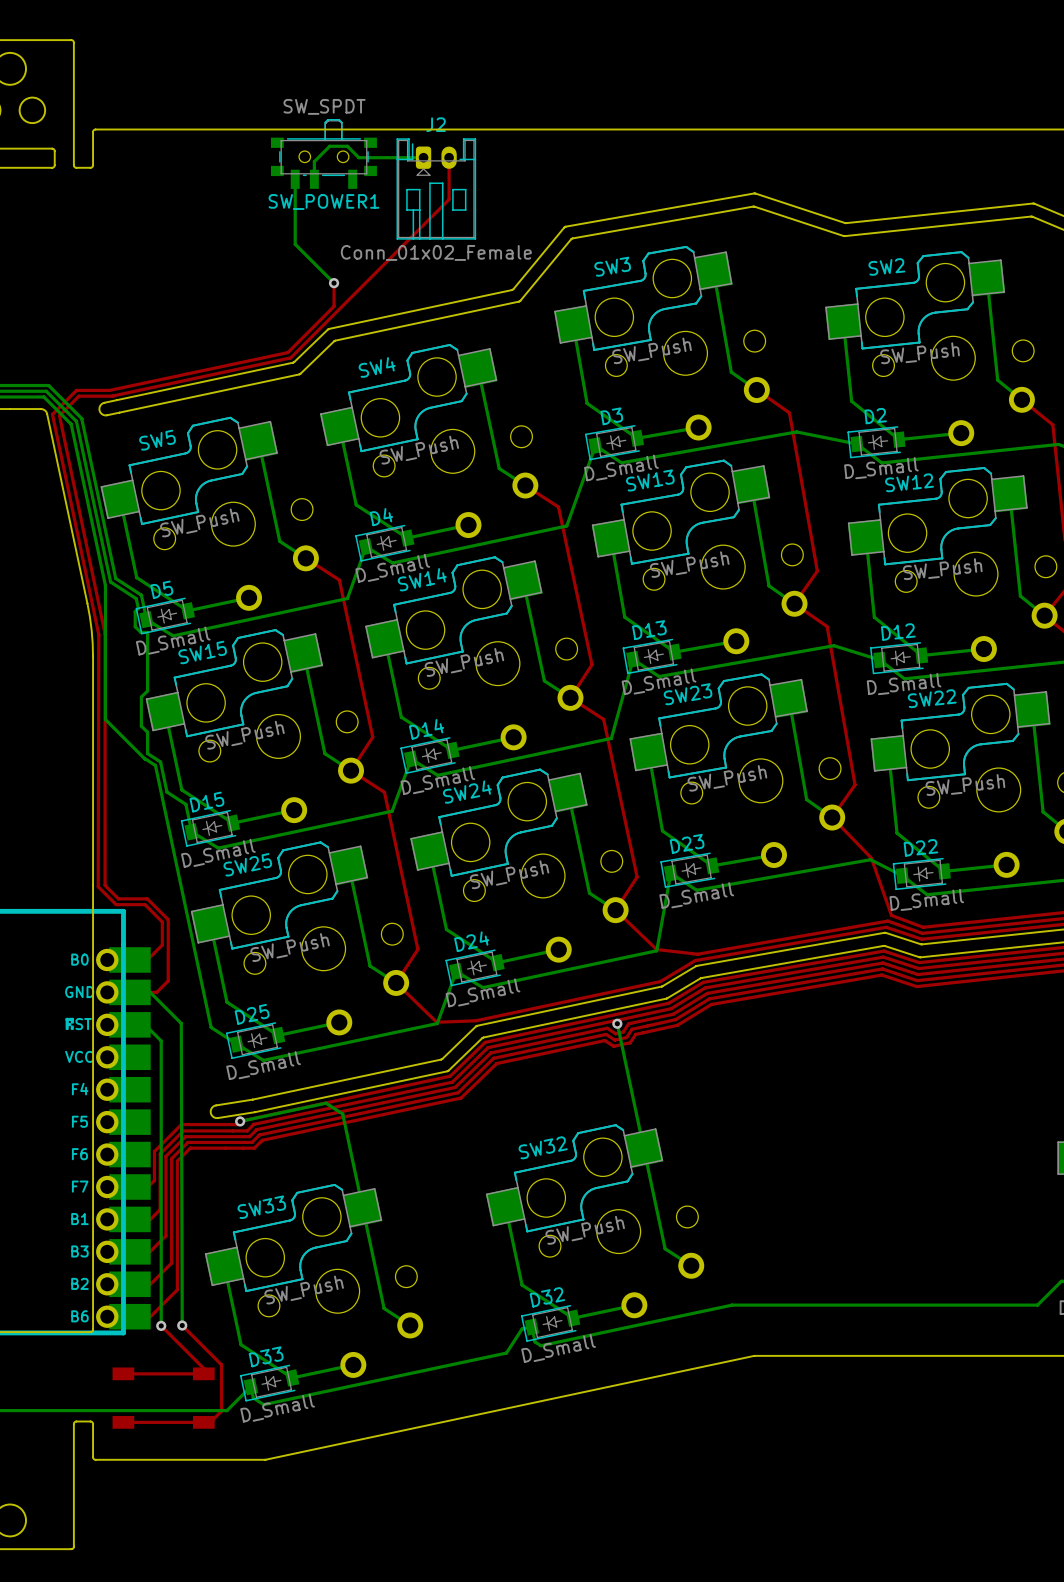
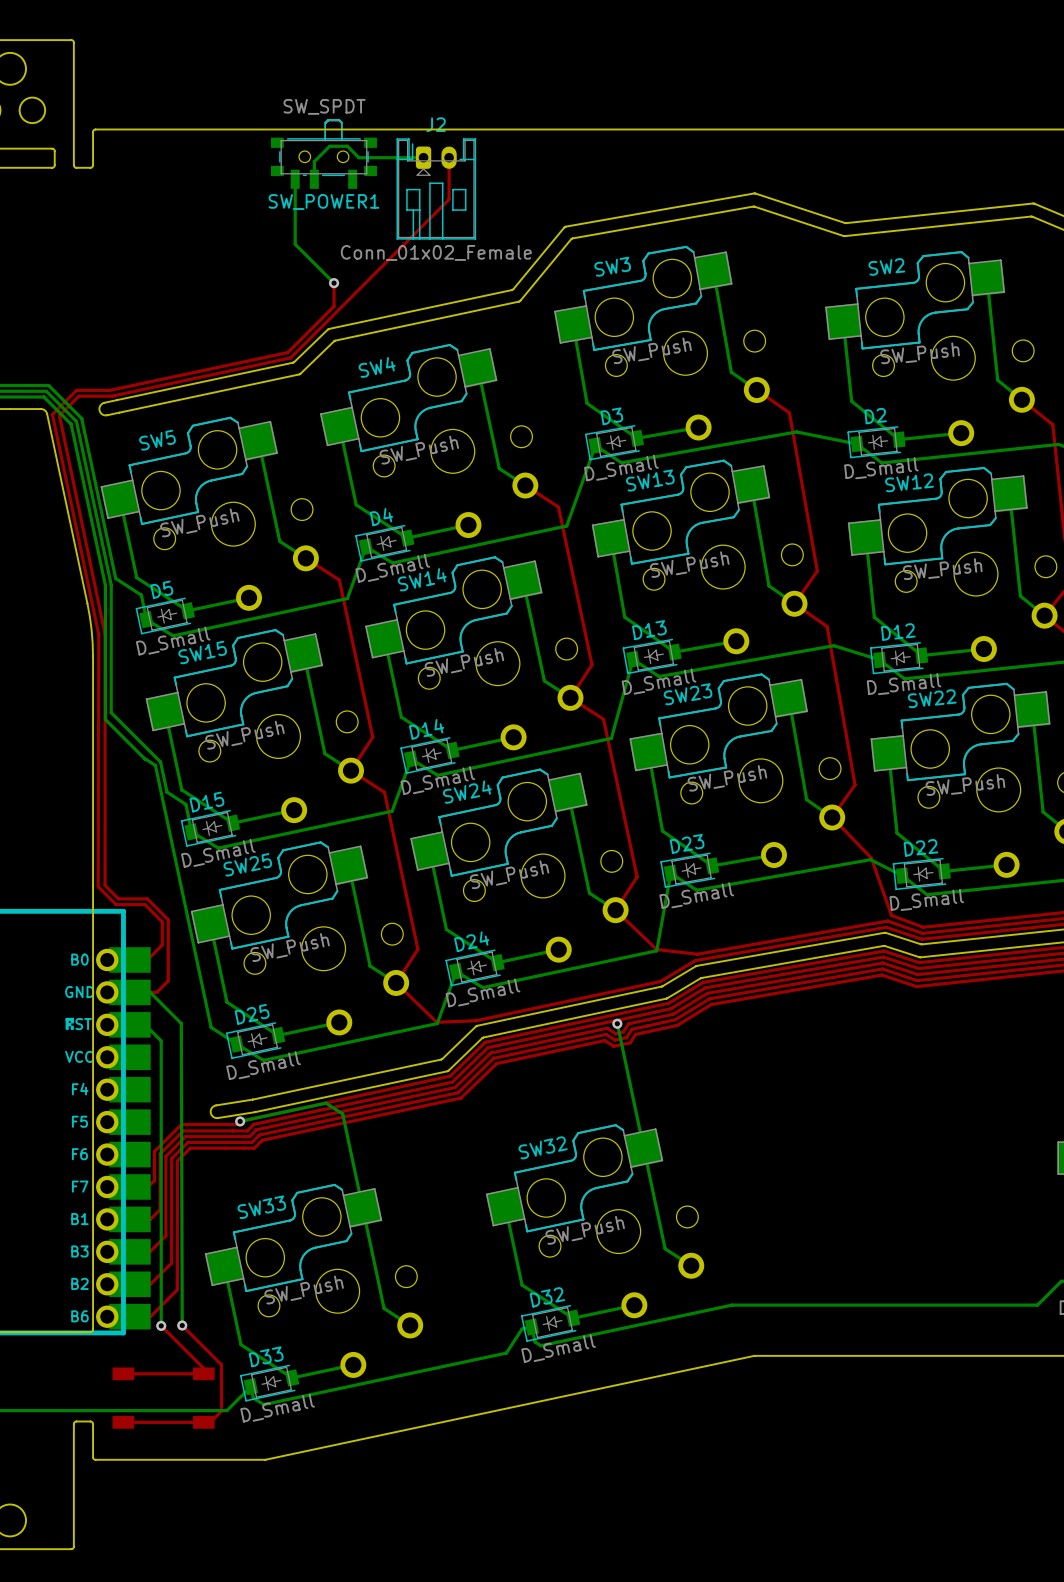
bottom track: (110, 582) (136, 598) (138, 608) (135, 611) (135, 626) (140, 632) (147, 632) (147, 690) (141, 697) (141, 726) (147, 732) (147, 753) (160, 762) -> (110, 582) (111, 712) (160, 762)

